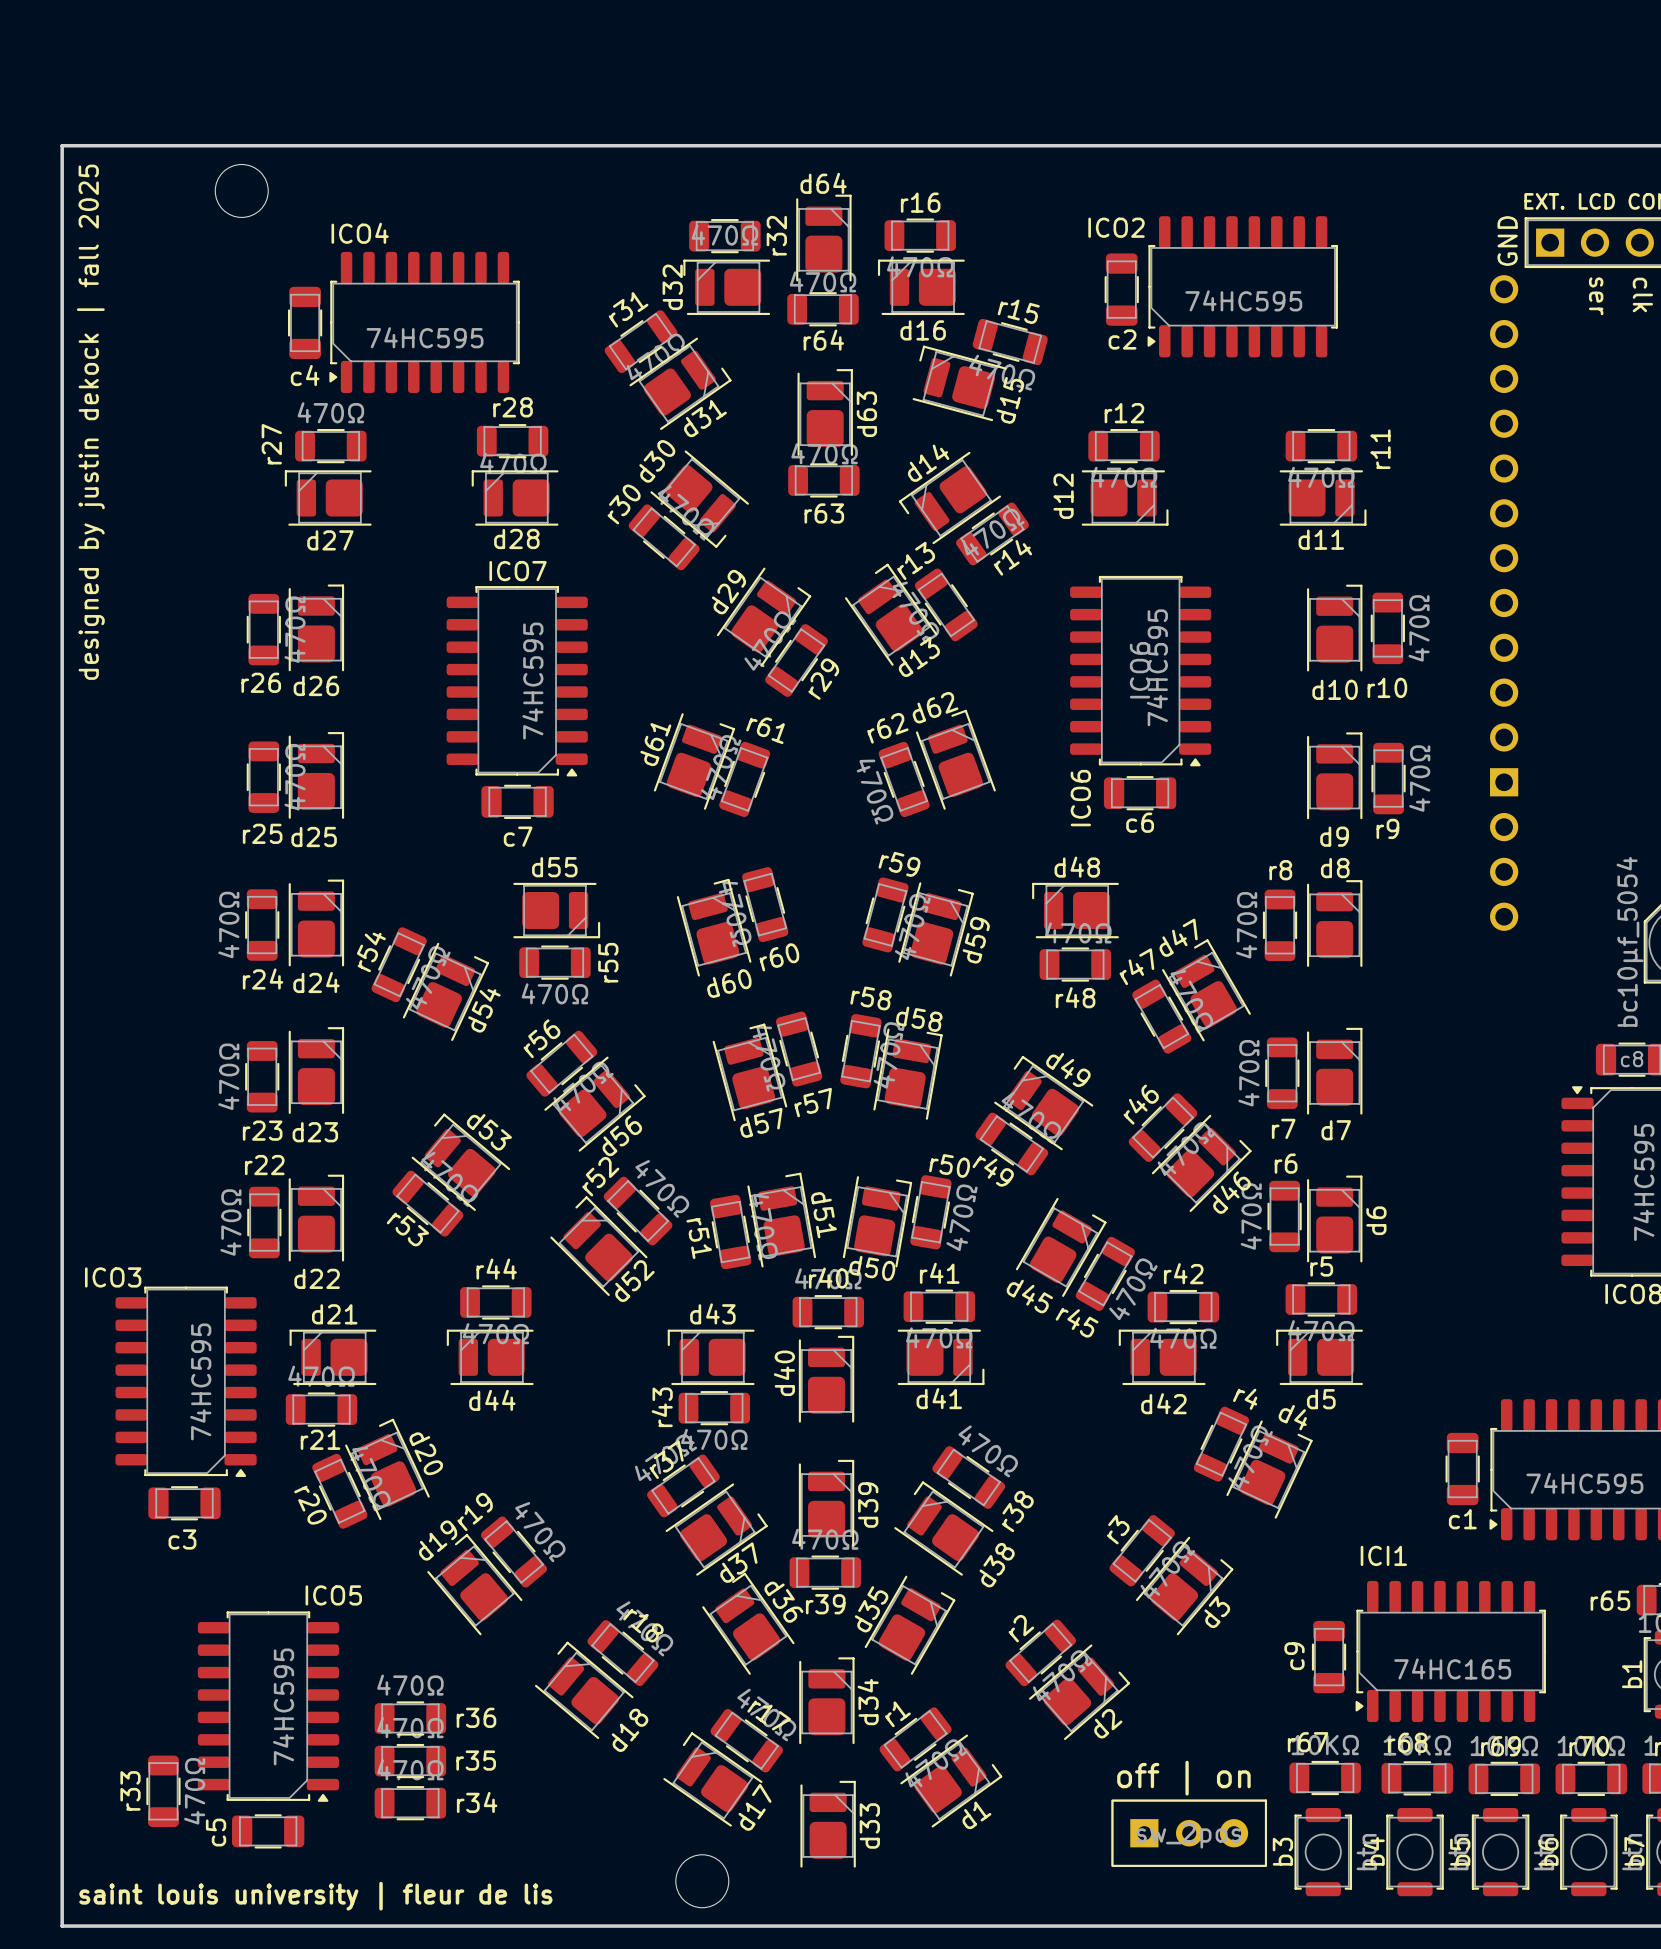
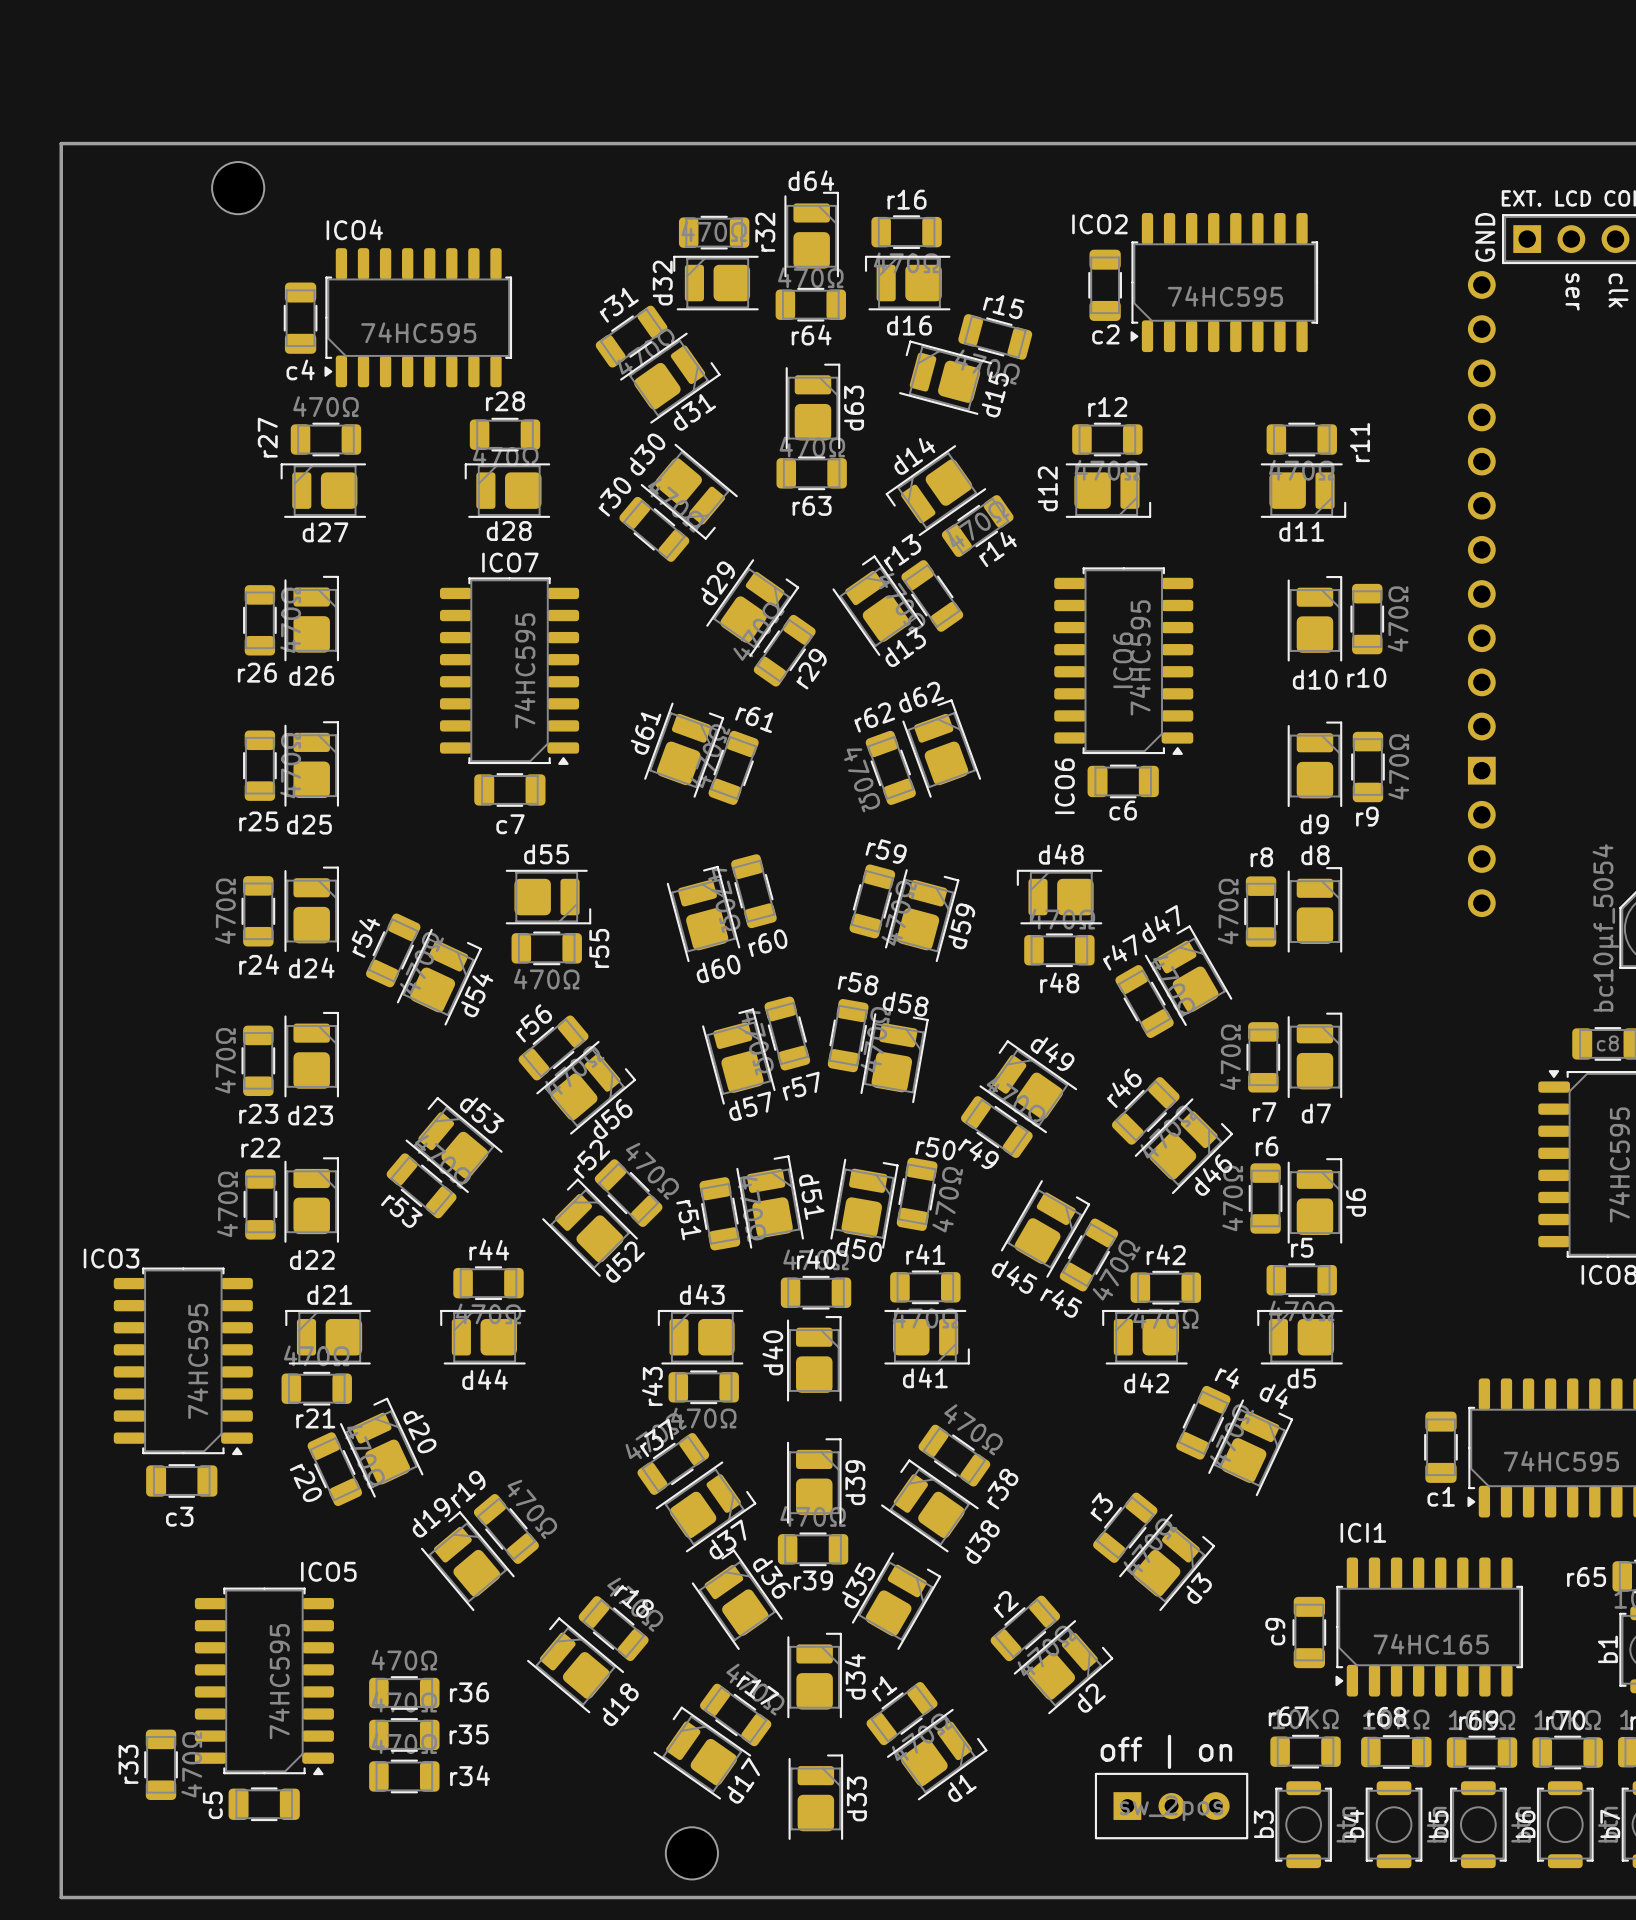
text: designed by justin dekock | fall 2025 (90, 422) -> none
text: saint louis university | fleur de lis (315, 1896) -> none

